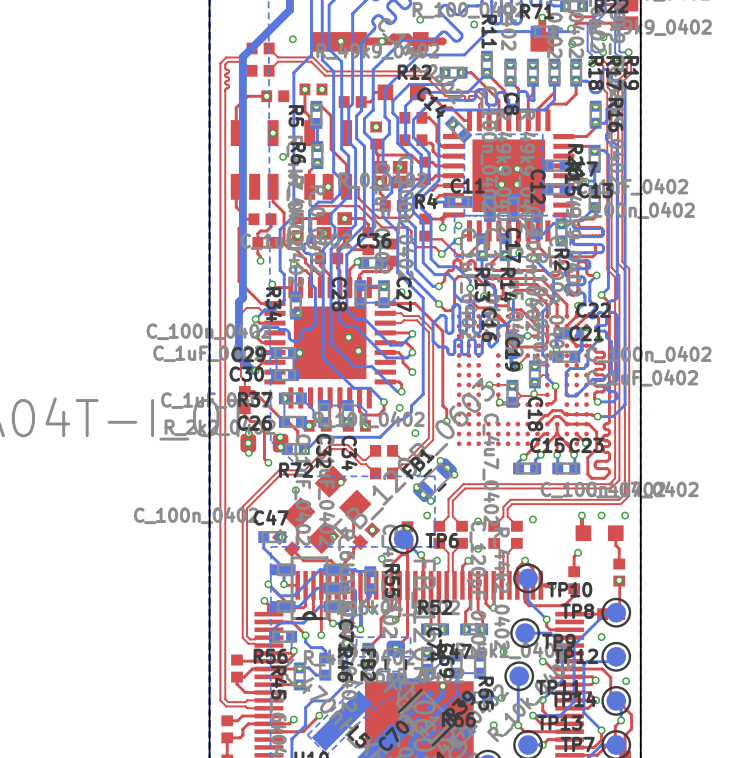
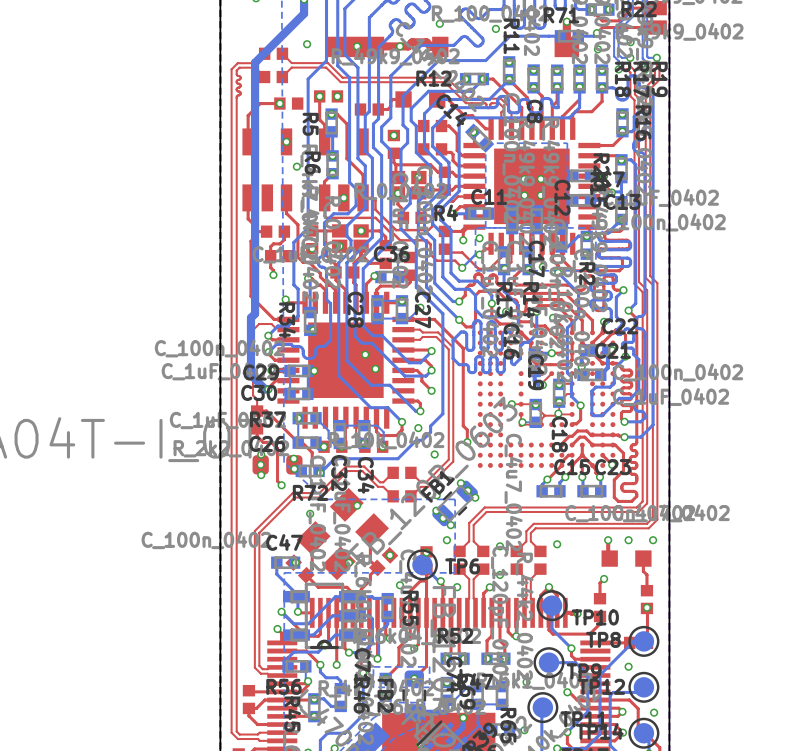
top track: (442, 41) (421, 41) -> none

